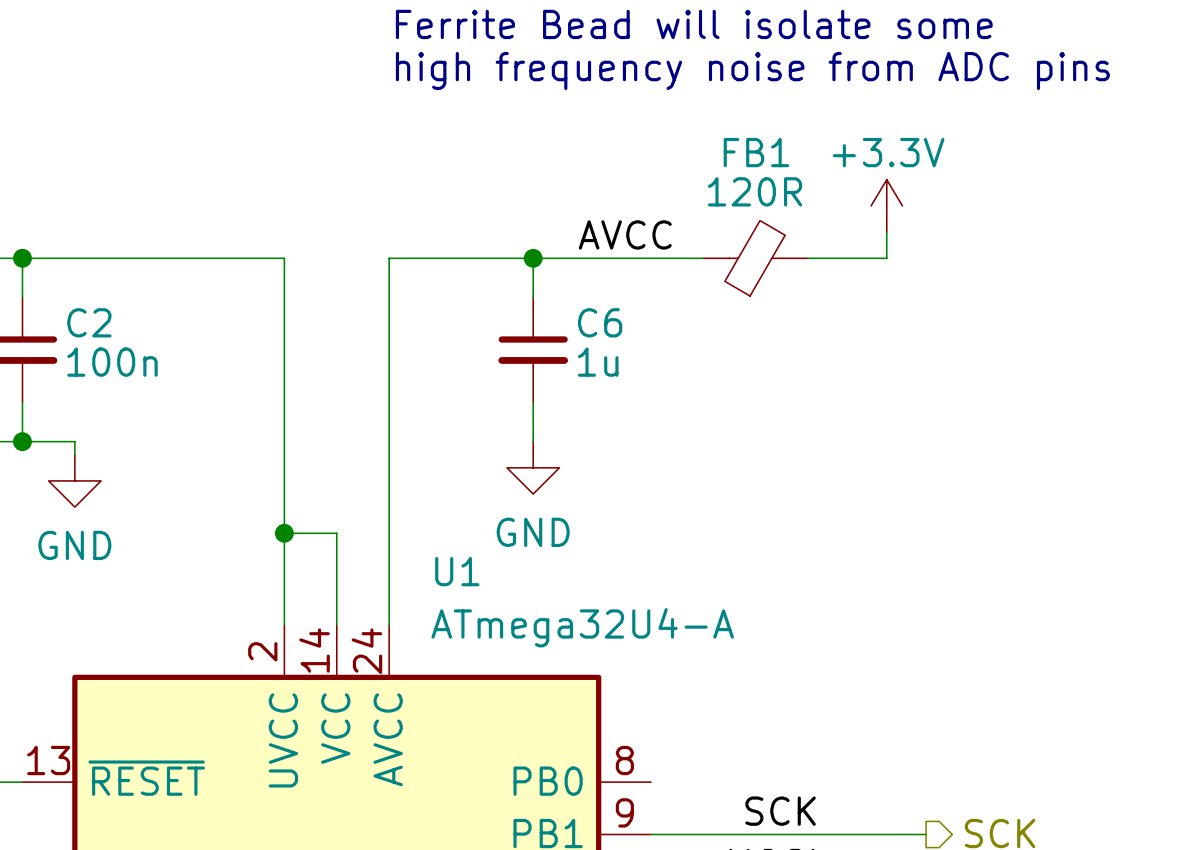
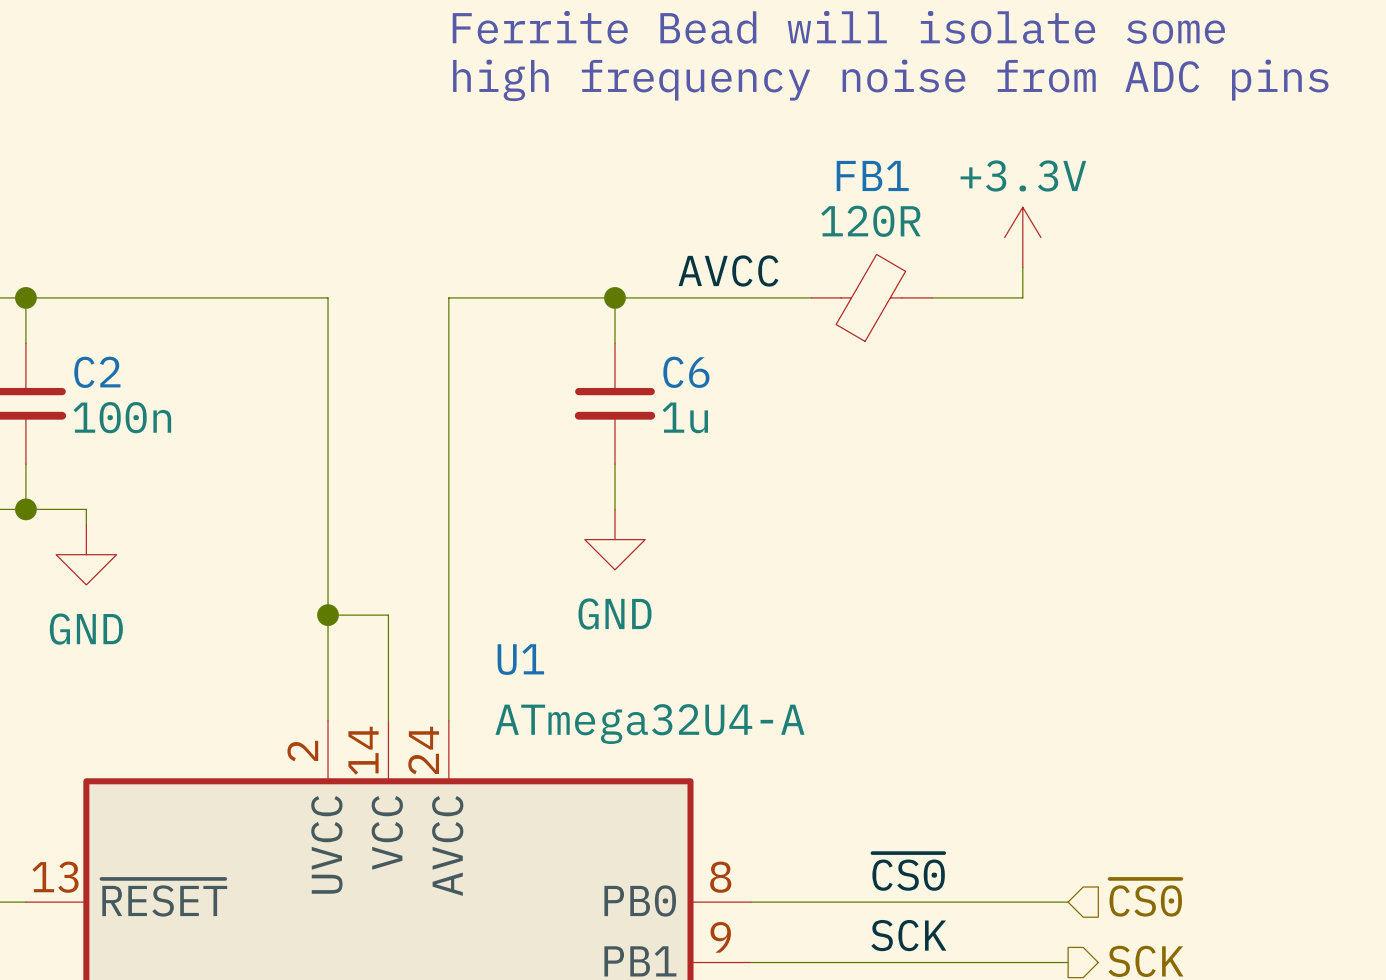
label: none -> ~{CS0} (908, 871)
hierarchical label: none -> ~{CS0} (1145, 897)
wire: none -> (750, 902) (1068, 902)

